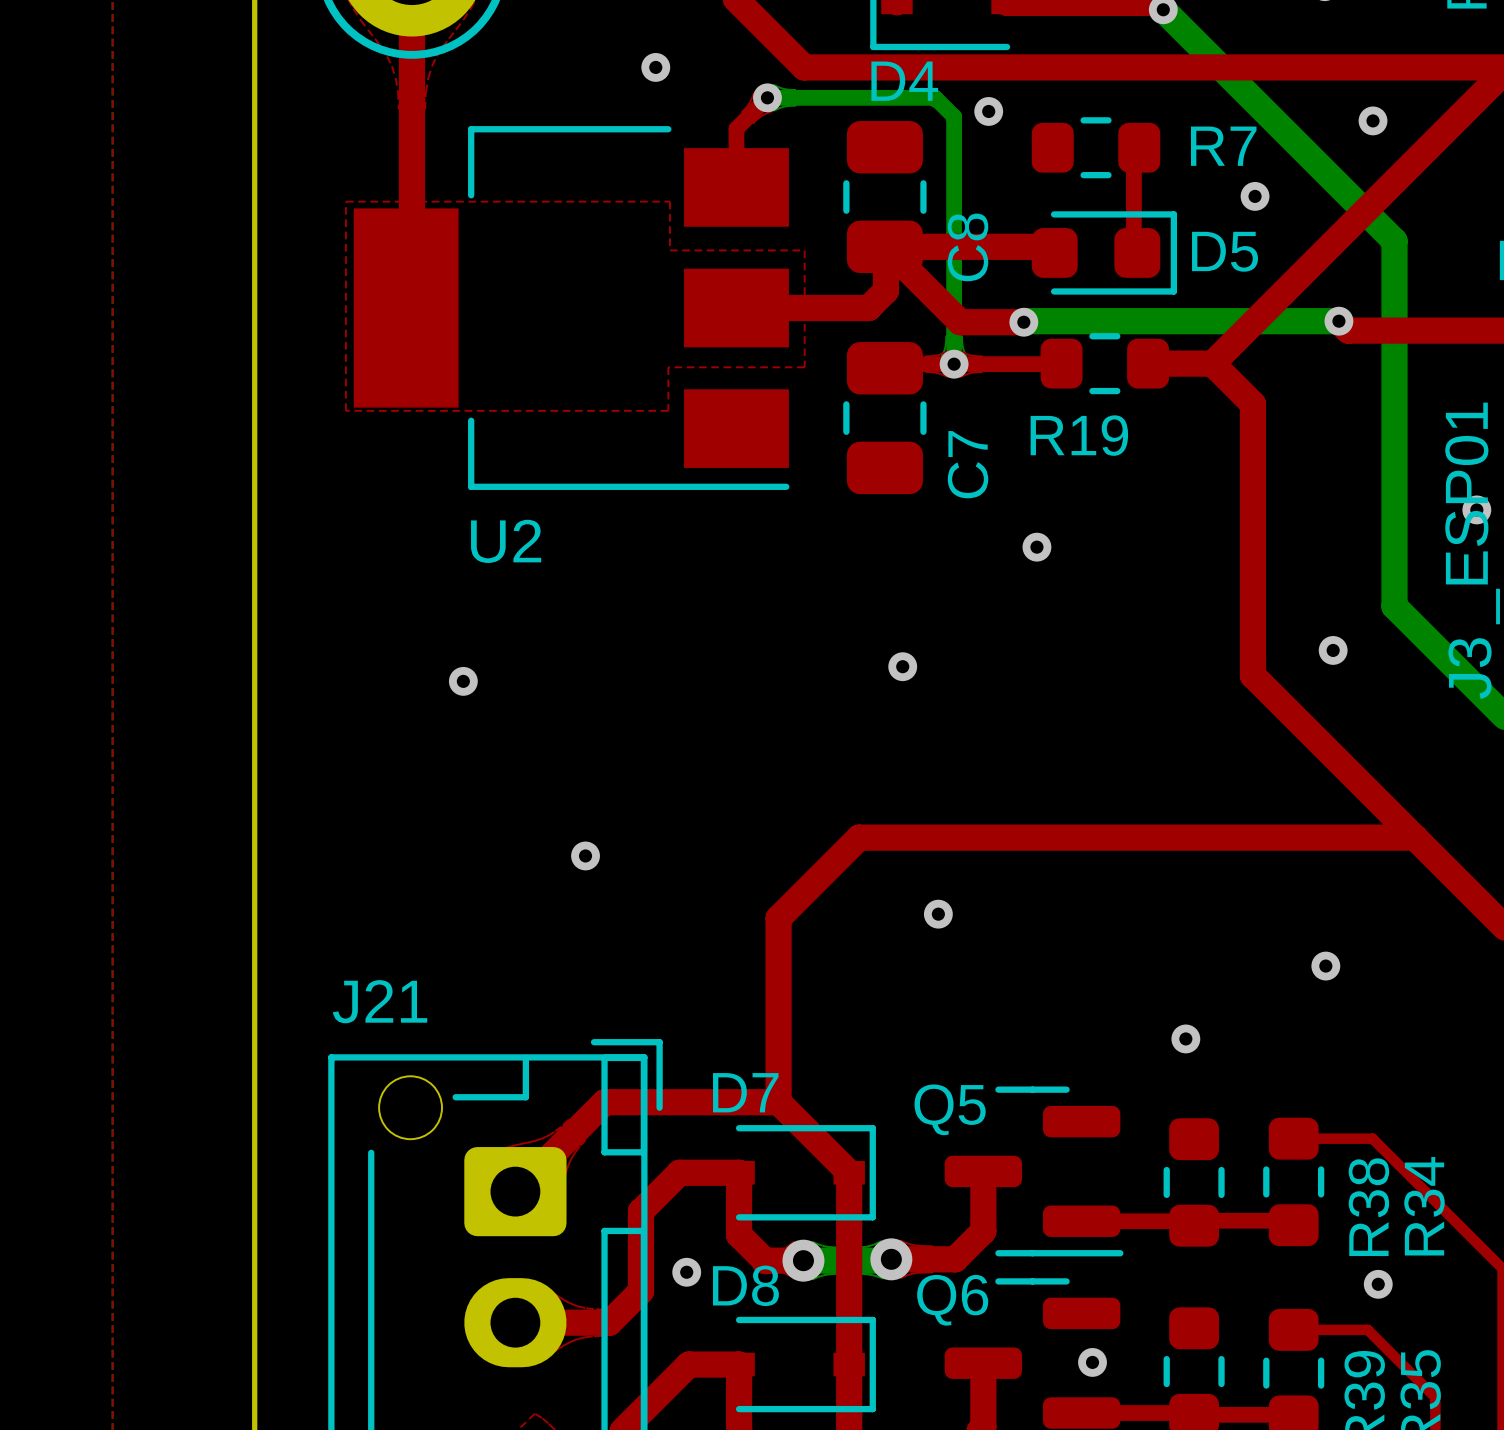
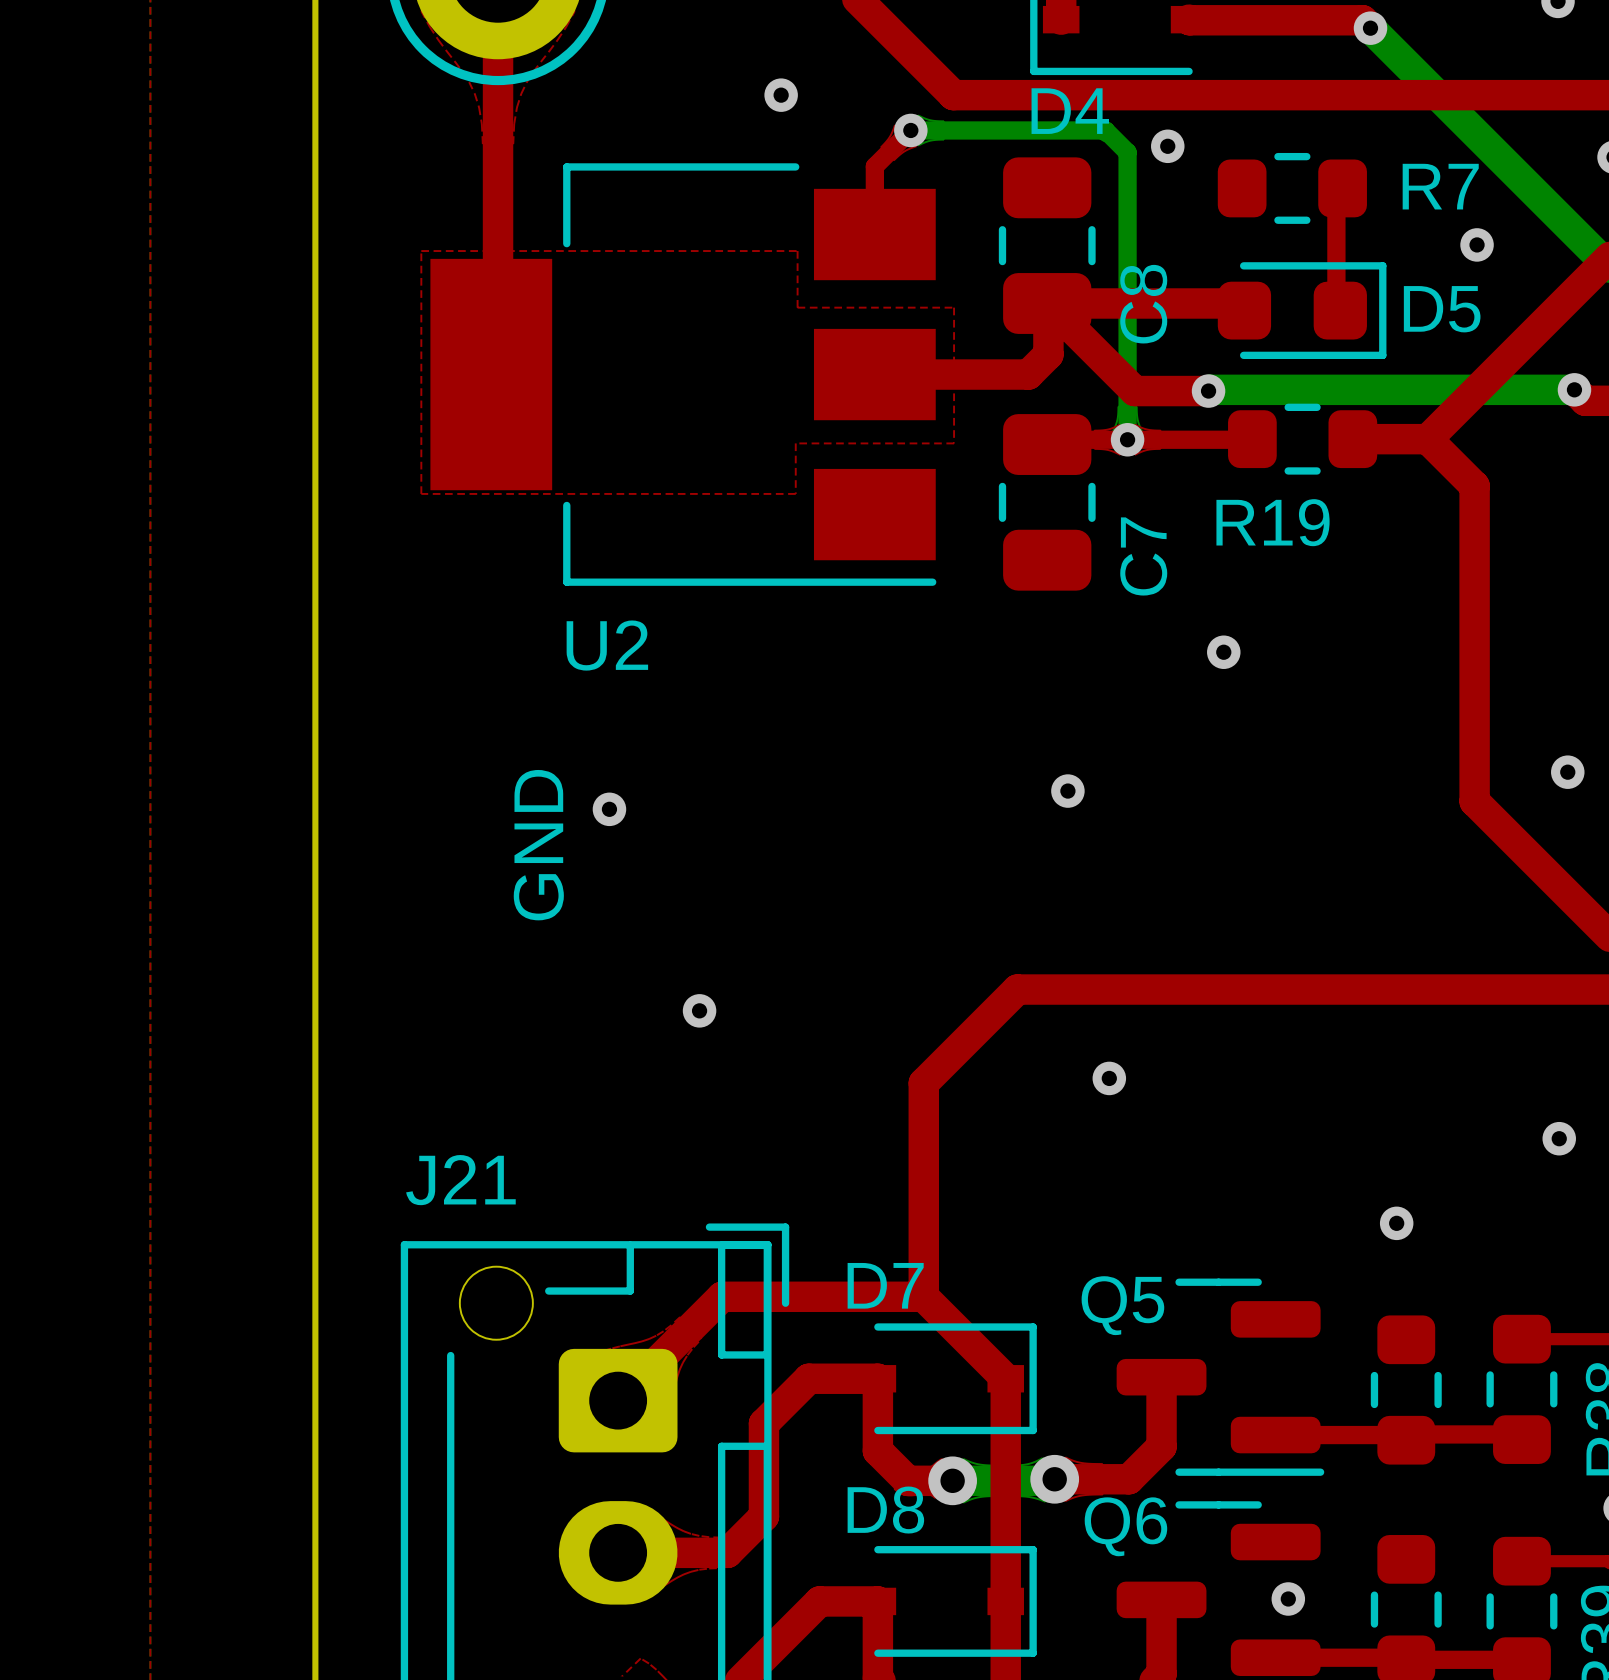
via position: (463, 681) -> (609, 809)
text: none -> GND (538, 845)
via: (686, 1272) -> none

